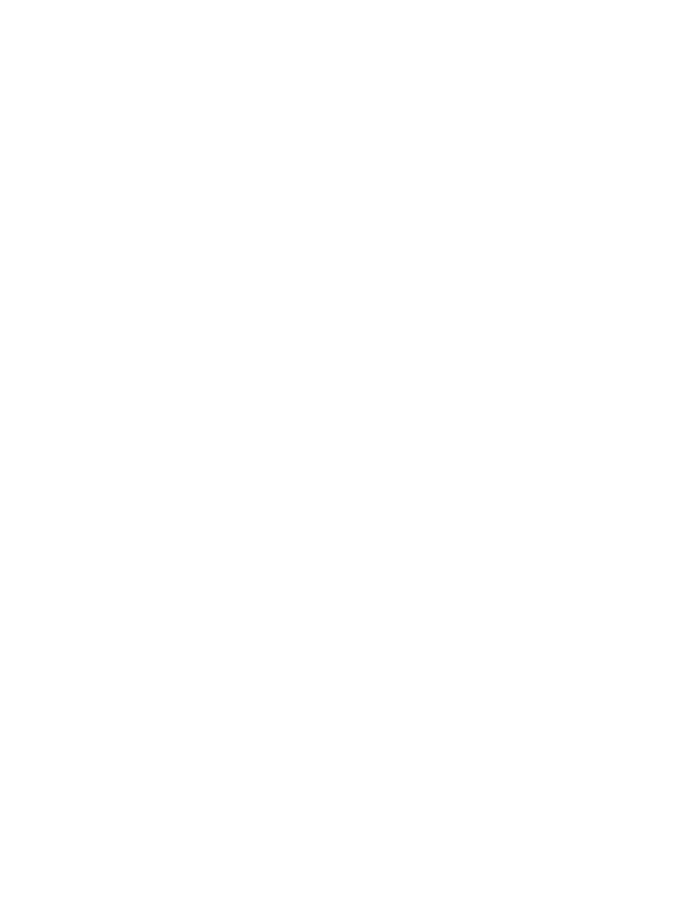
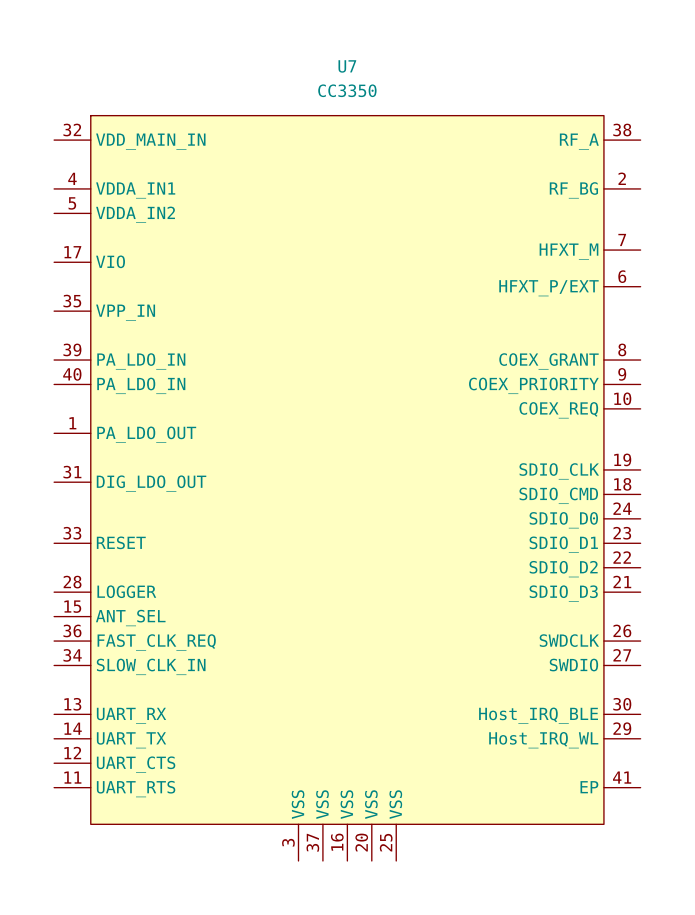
U7: none -> CC3350 (347, 488)

